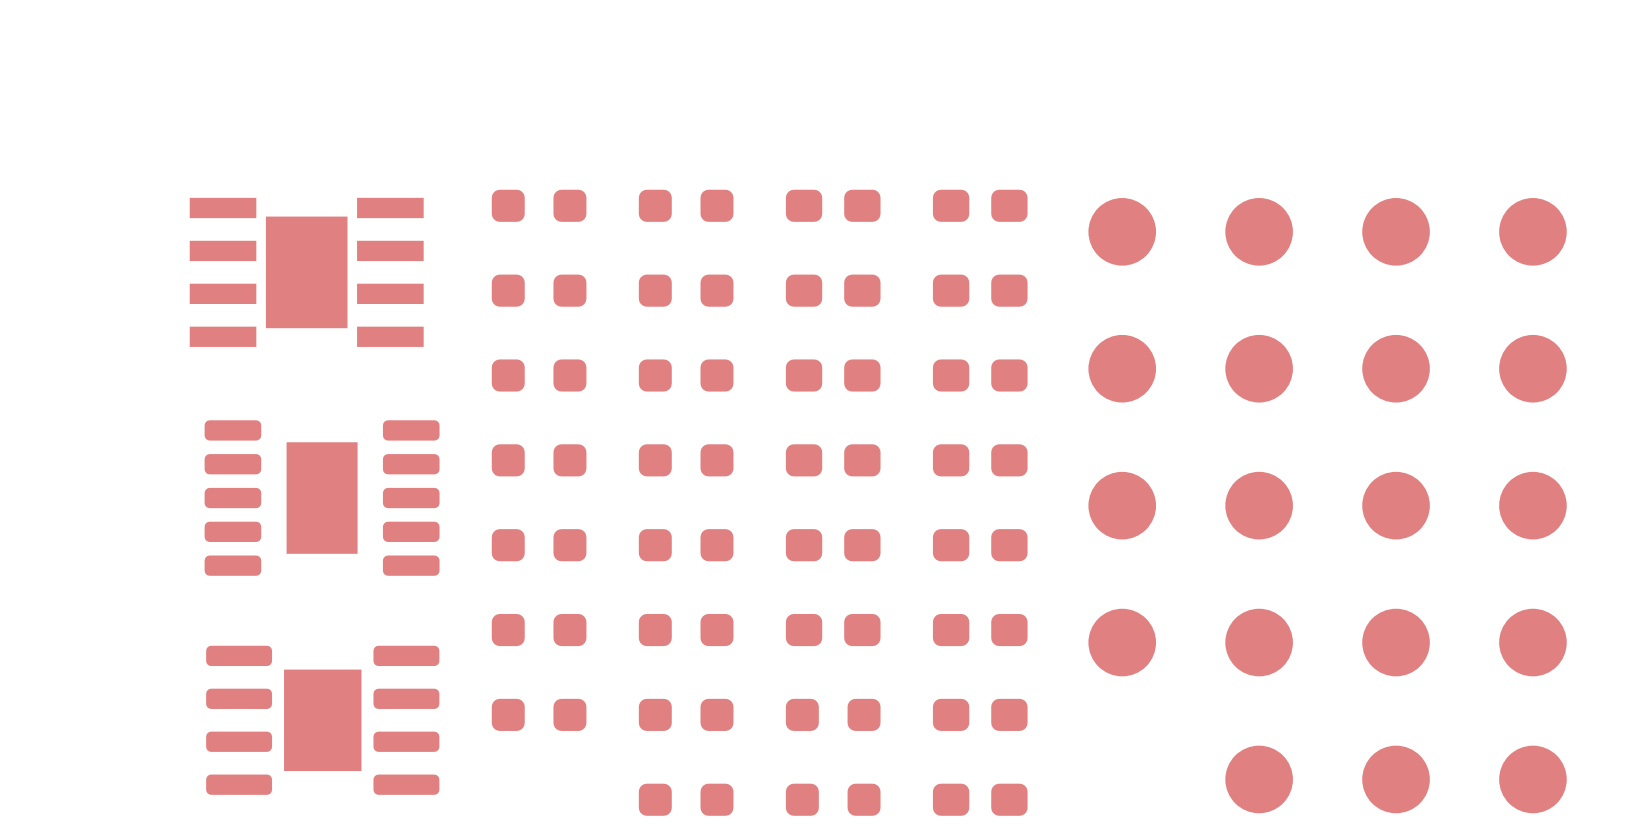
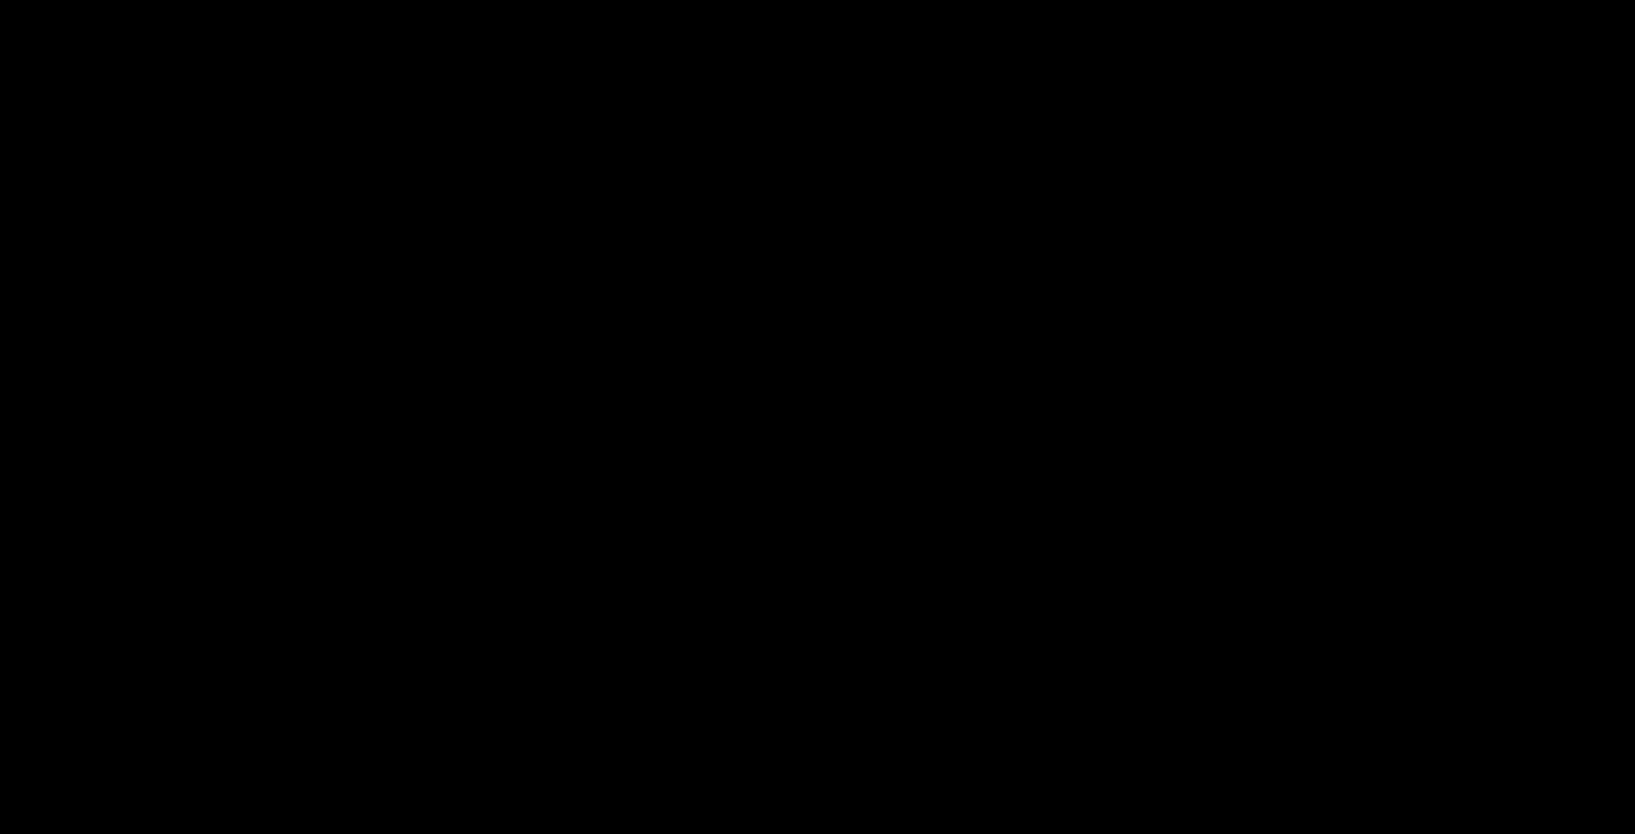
part: (539, 205) -> none
part: (686, 205) -> none
part: (833, 205) -> none
part: (980, 205) -> none
part: (1122, 231) -> none
part: (1259, 231) -> none
part: (1396, 231) -> none
part: (1532, 231) -> none
part: (306, 272) -> none
part: (539, 290) -> none
part: (686, 290) -> none
part: (833, 290) -> none
part: (980, 290) -> none
part: (1122, 368) -> none
part: (1259, 368) -> none
part: (1396, 368) -> none
part: (1532, 368) -> none
part: (539, 375) -> none
part: (686, 375) -> none
part: (833, 375) -> none
part: (980, 375) -> none
part: (539, 460) -> none
part: (686, 460) -> none
part: (833, 460) -> none
part: (980, 460) -> none
part: (322, 498) -> none
part: (1122, 505) -> none
part: (1259, 505) -> none
part: (1396, 505) -> none
part: (1532, 505) -> none
part: (539, 545) -> none
part: (686, 545) -> none
part: (833, 545) -> none
part: (980, 545) -> none
part: (539, 630) -> none
part: (686, 630) -> none
part: (833, 630) -> none
part: (980, 630) -> none
part: (1122, 642) -> none
part: (1259, 642) -> none
part: (1396, 642) -> none
part: (1532, 642) -> none
part: (539, 714) -> none
part: (686, 714) -> none
part: (833, 714) -> none
part: (980, 714) -> none
part: (322, 720) -> none
part: (1259, 779) -> none
part: (1396, 779) -> none
part: (1532, 779) -> none
part: (686, 799) -> none
part: (833, 799) -> none
part: (980, 799) -> none

